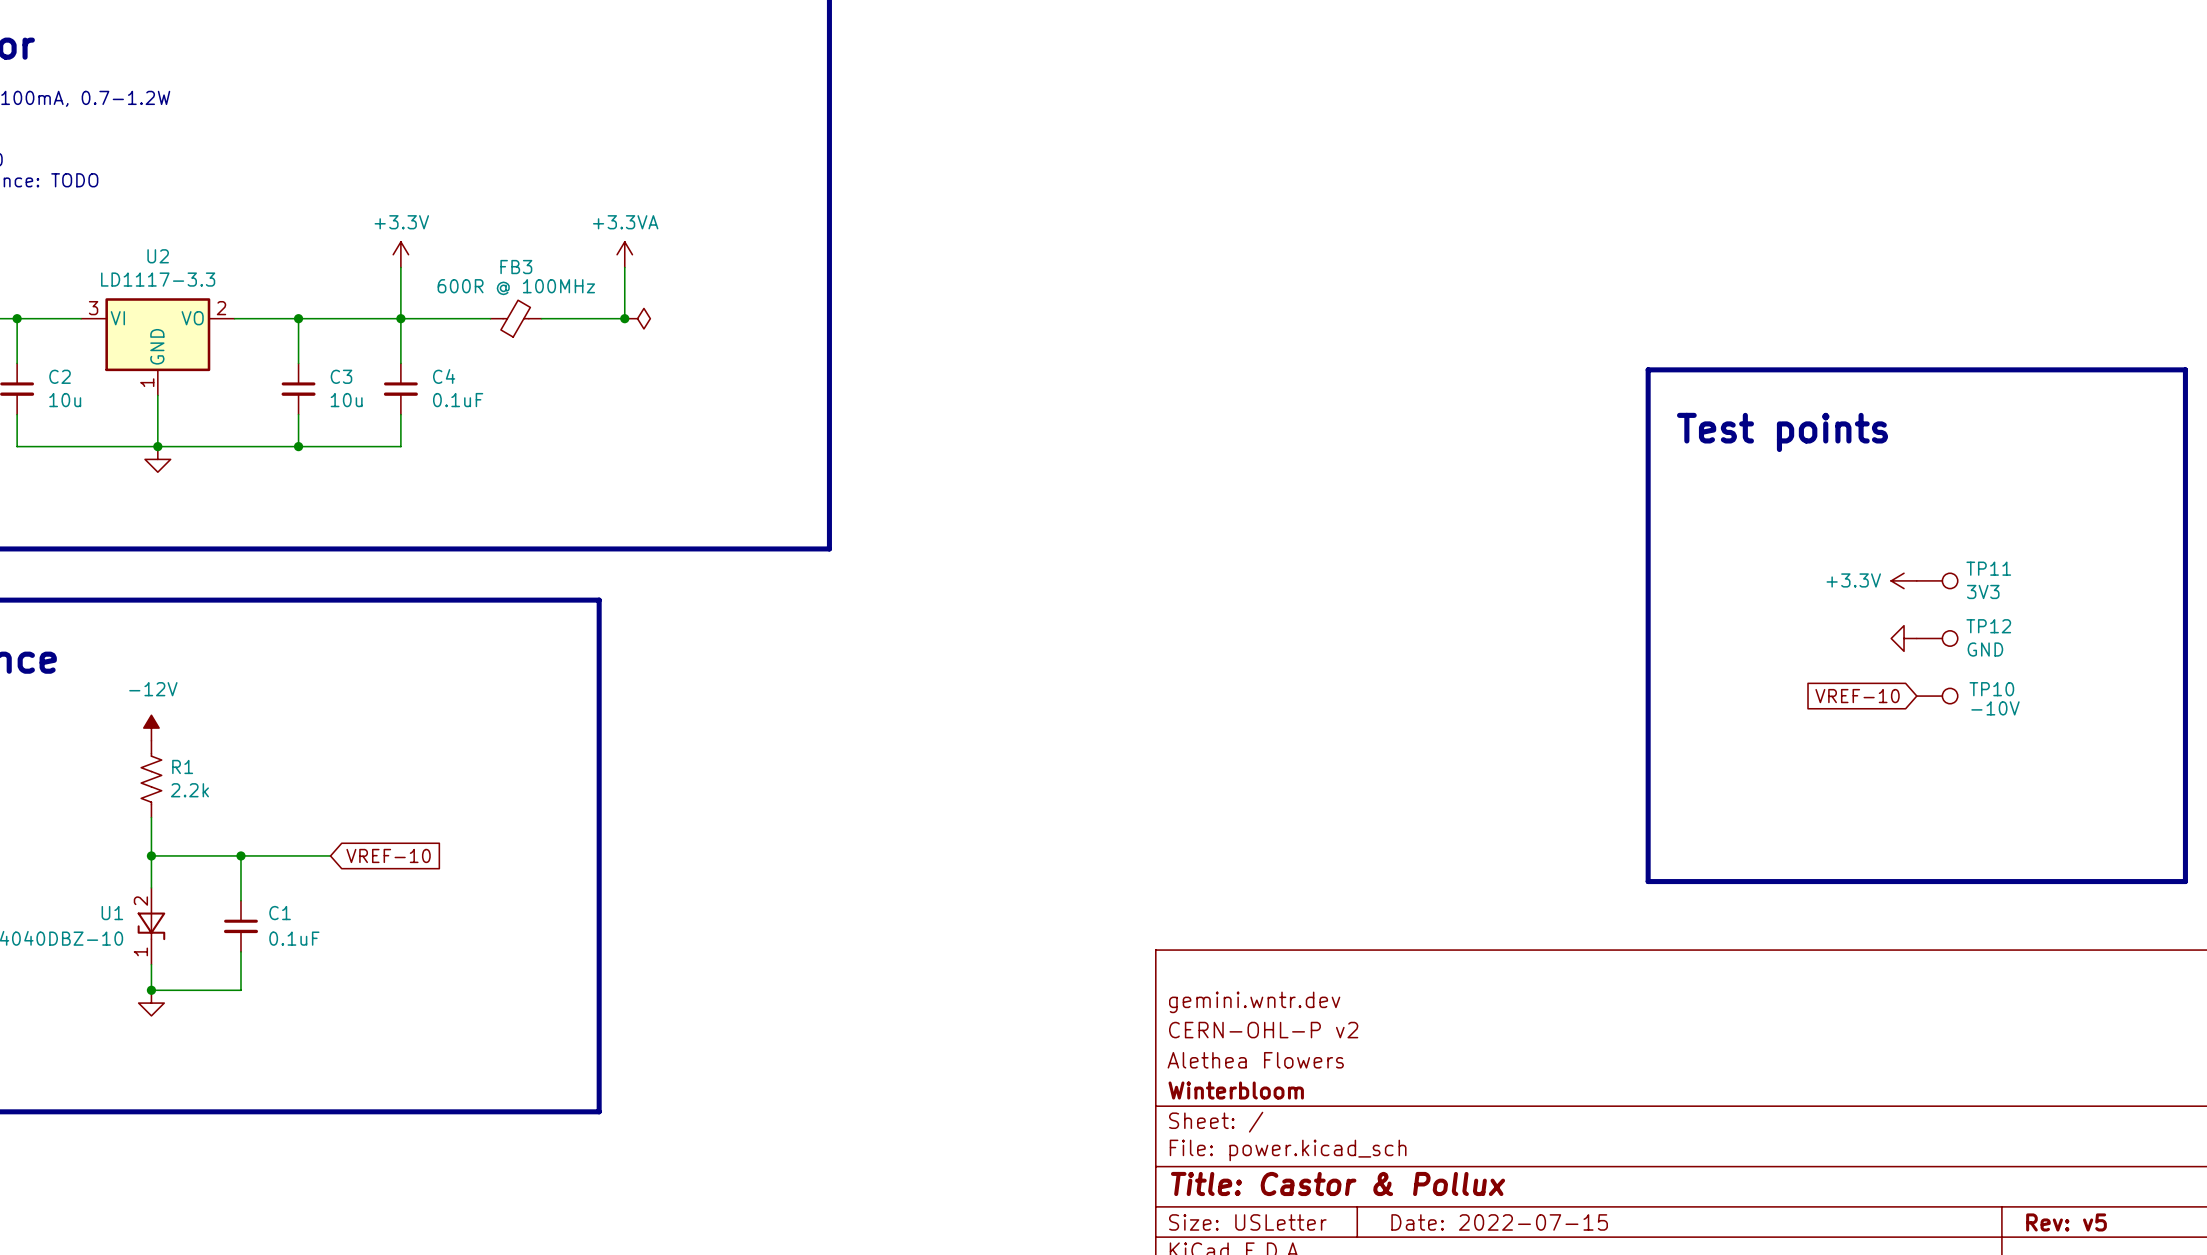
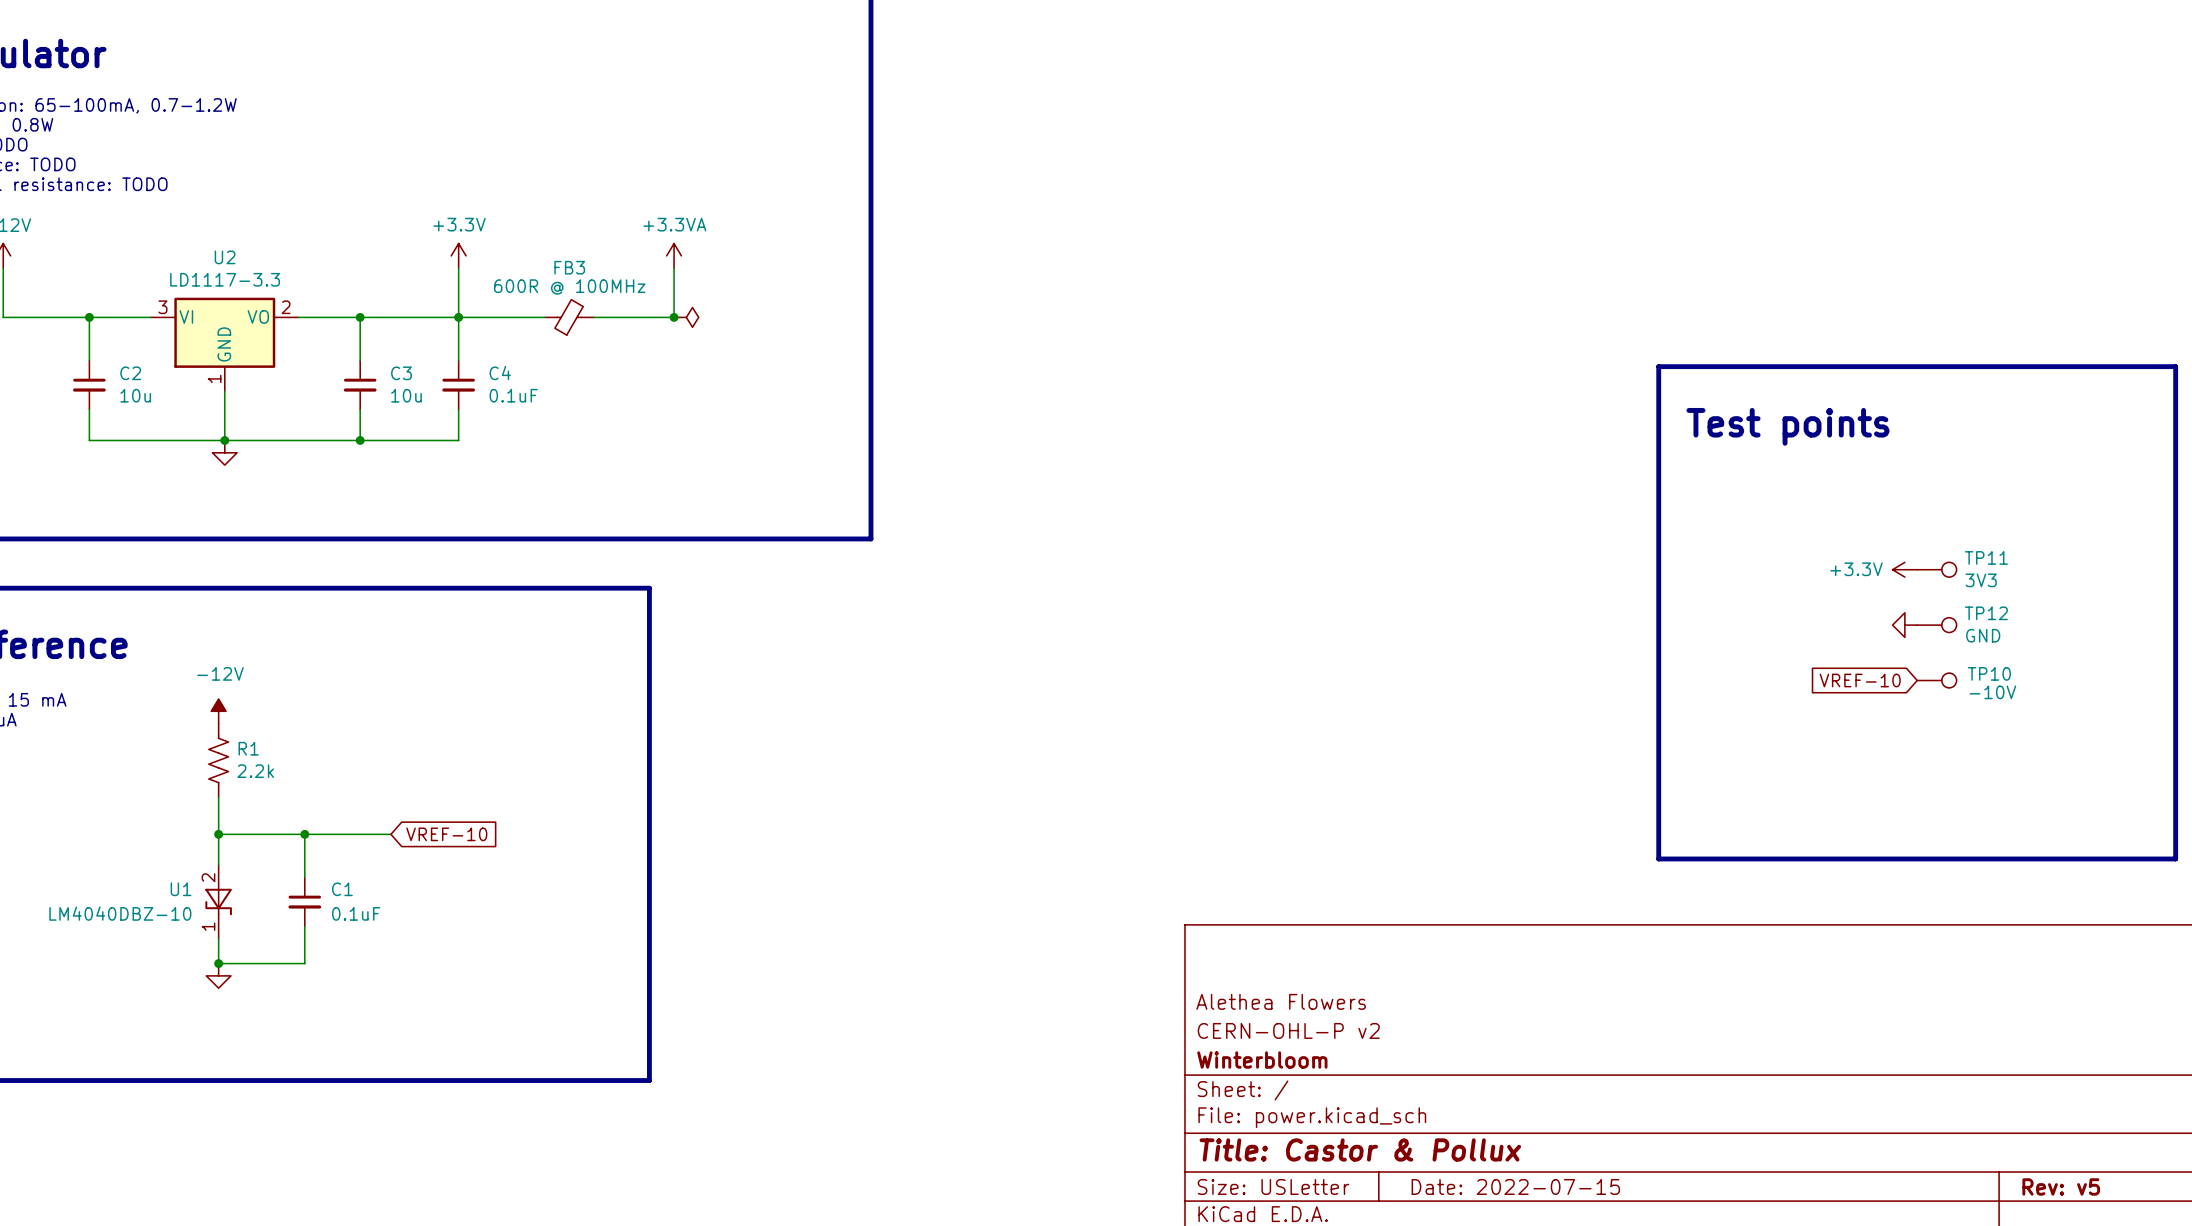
title block: gemini.wntr.dev (1254, 1002) -> none
title block: CERN-OHL-P v2 (1263, 1030) -> Alethea Flowers (1281, 1001)
title block: Alethea Flowers (1255, 1060) -> CERN-OHL-P v2 (1288, 1030)

